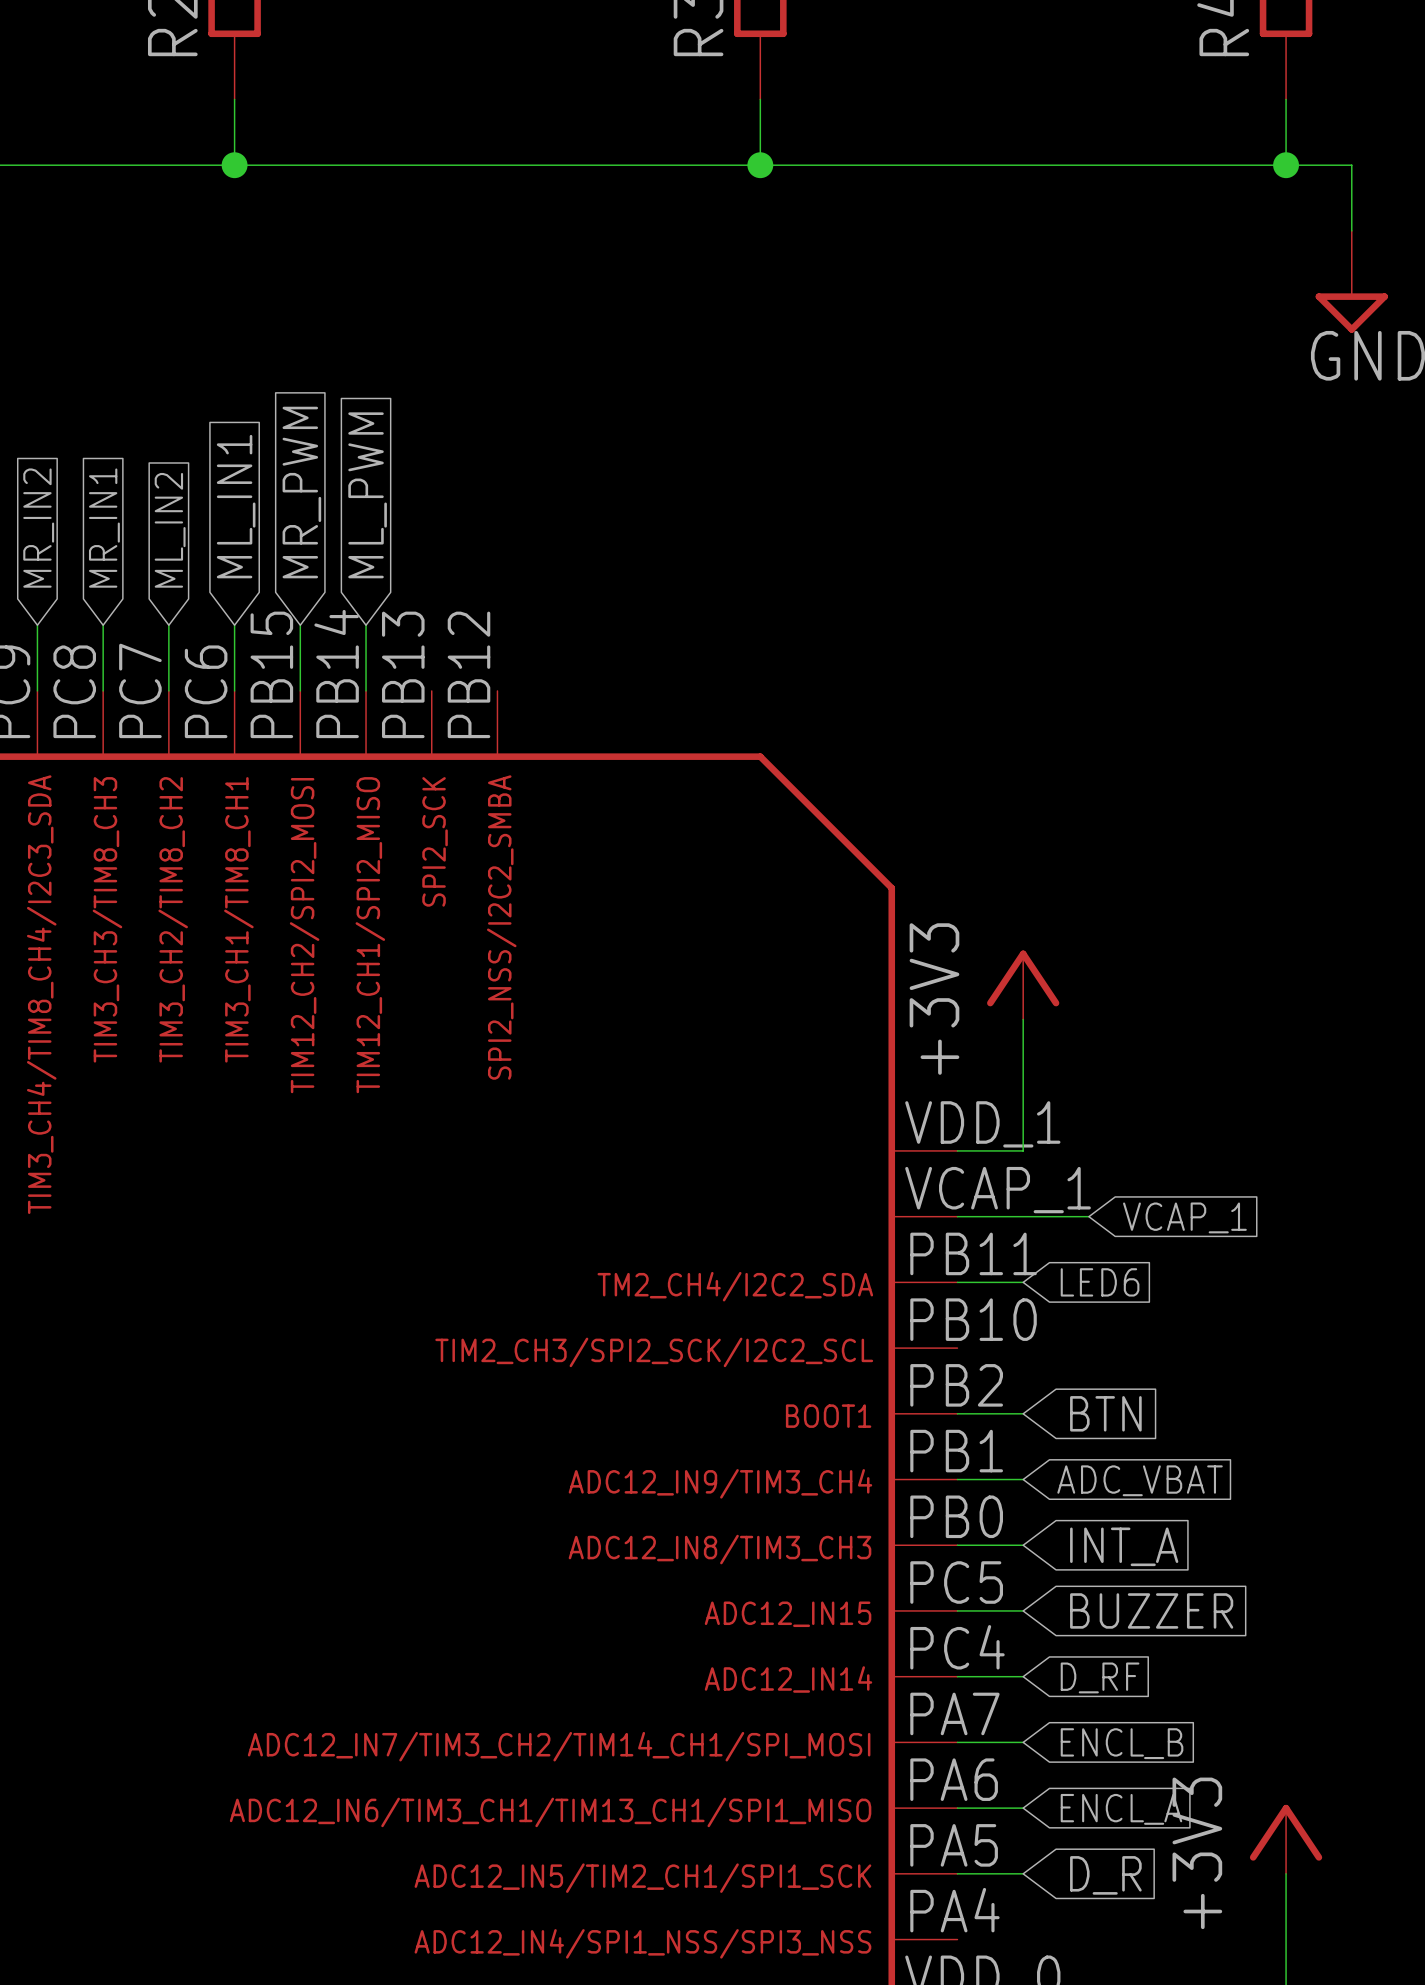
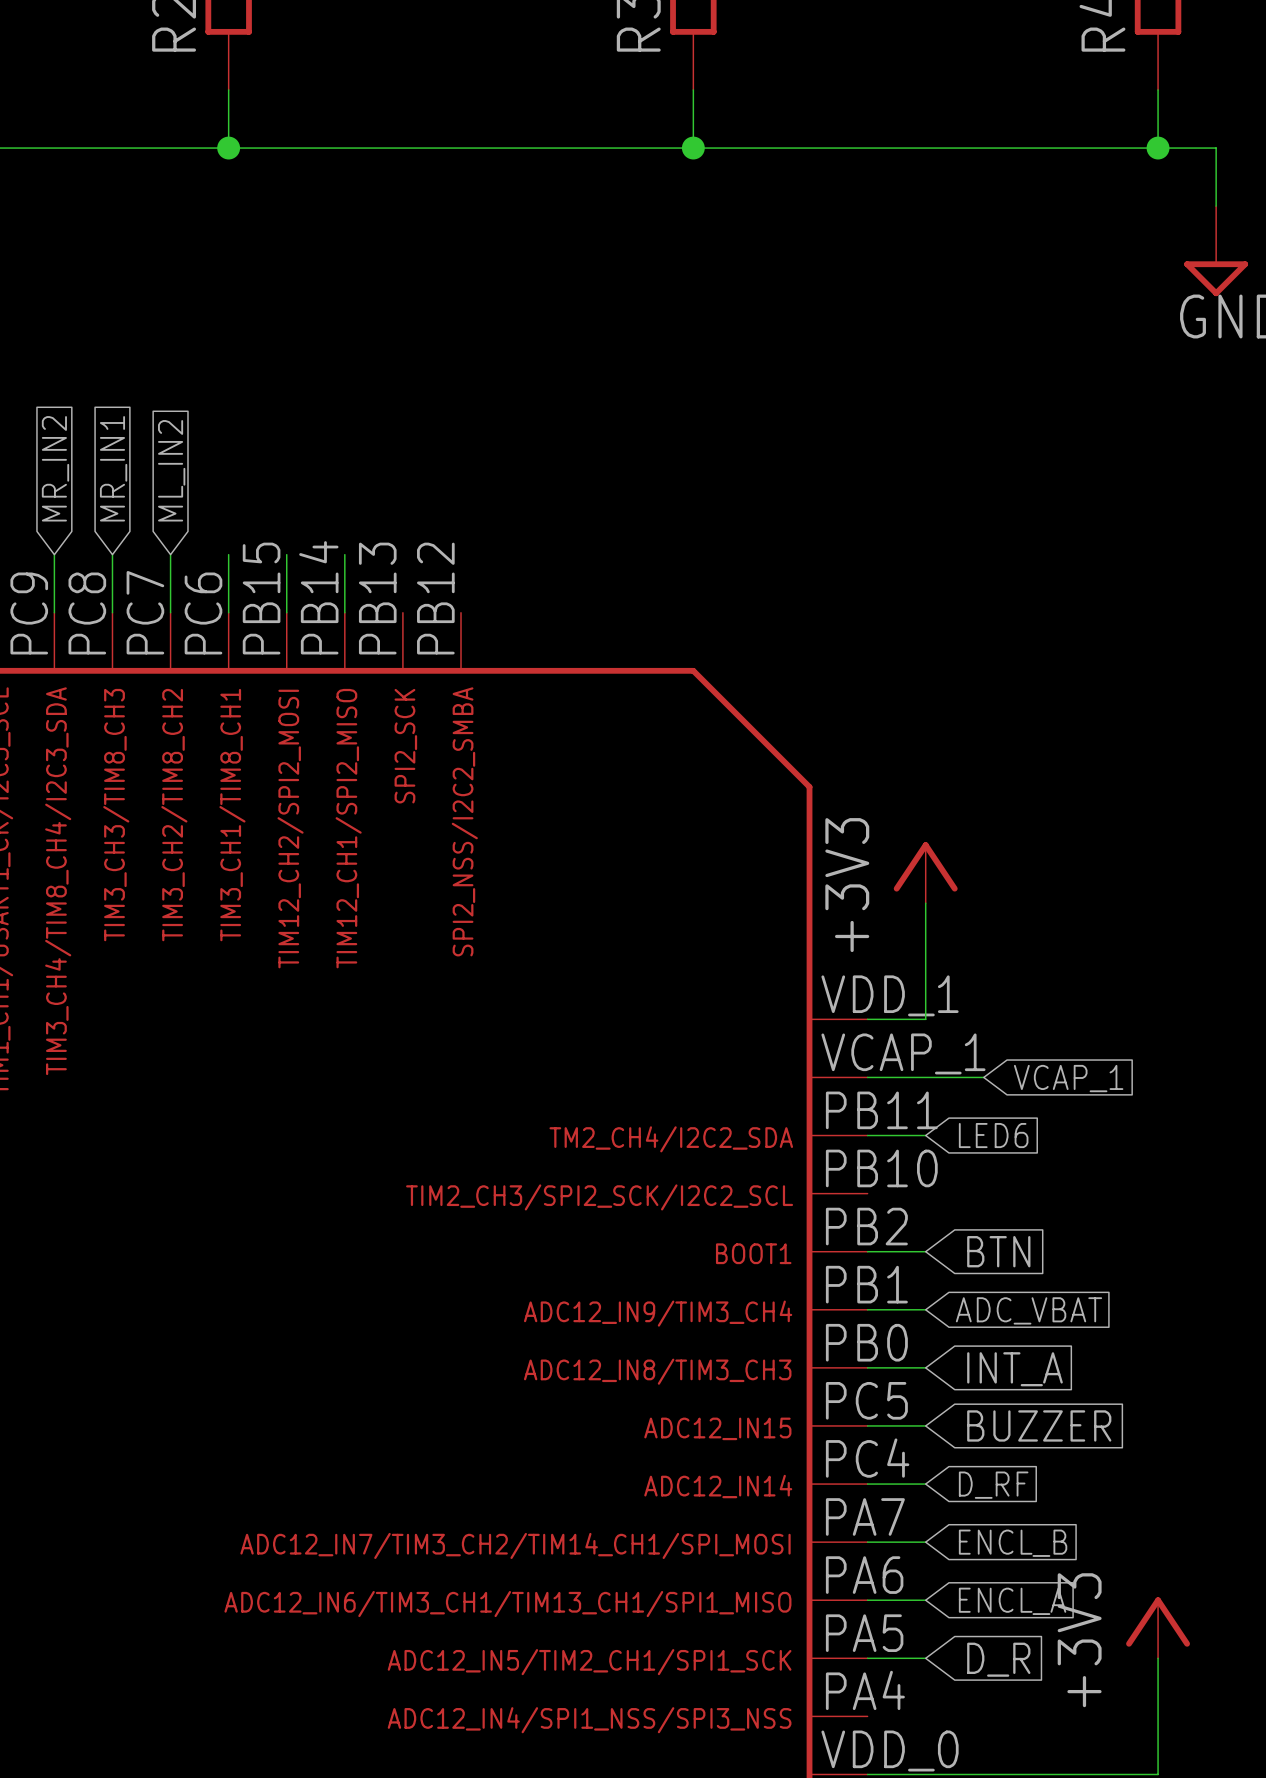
global label: MR_PWM (301, 492) -> none
global label: ML_PWM (367, 495) -> none
global label: ML_IN1 (236, 506) -> none

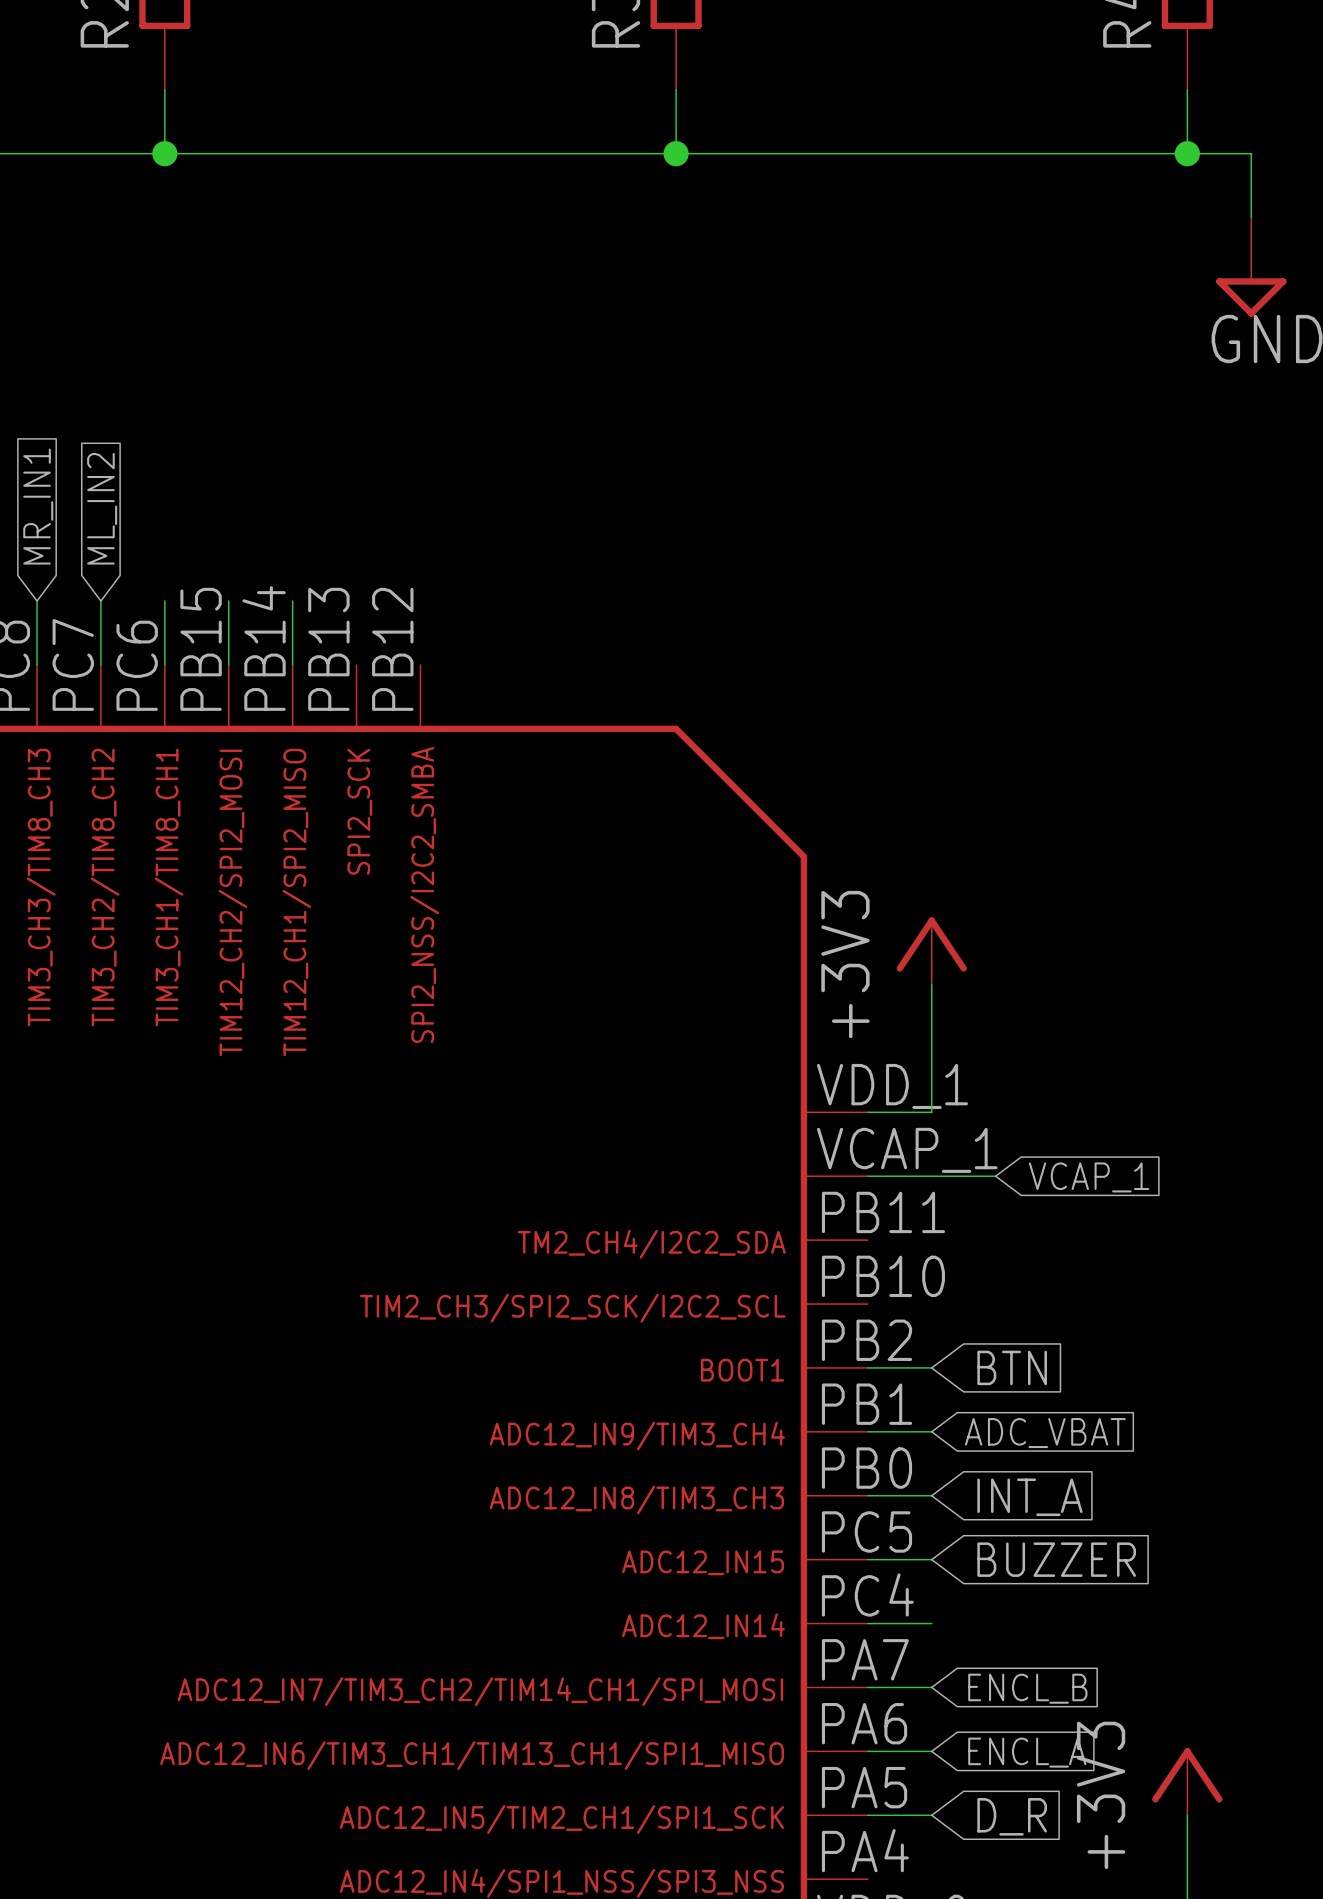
wire: (867, 1135) (925, 1135) -> none
global label: LED6 (993, 1135) -> none
global label: D_RF (993, 1485) -> none

